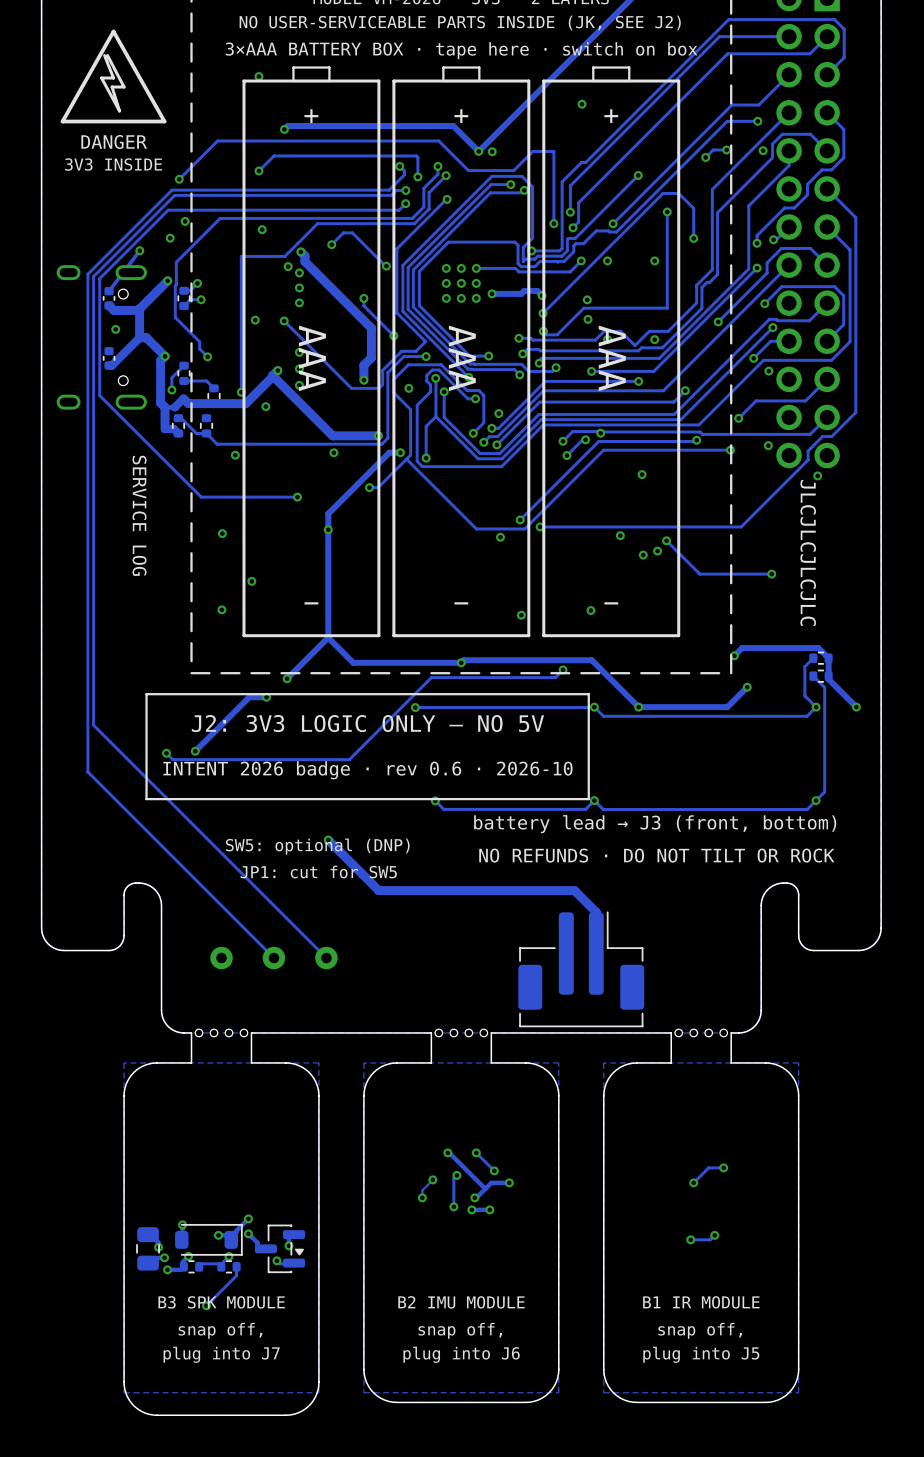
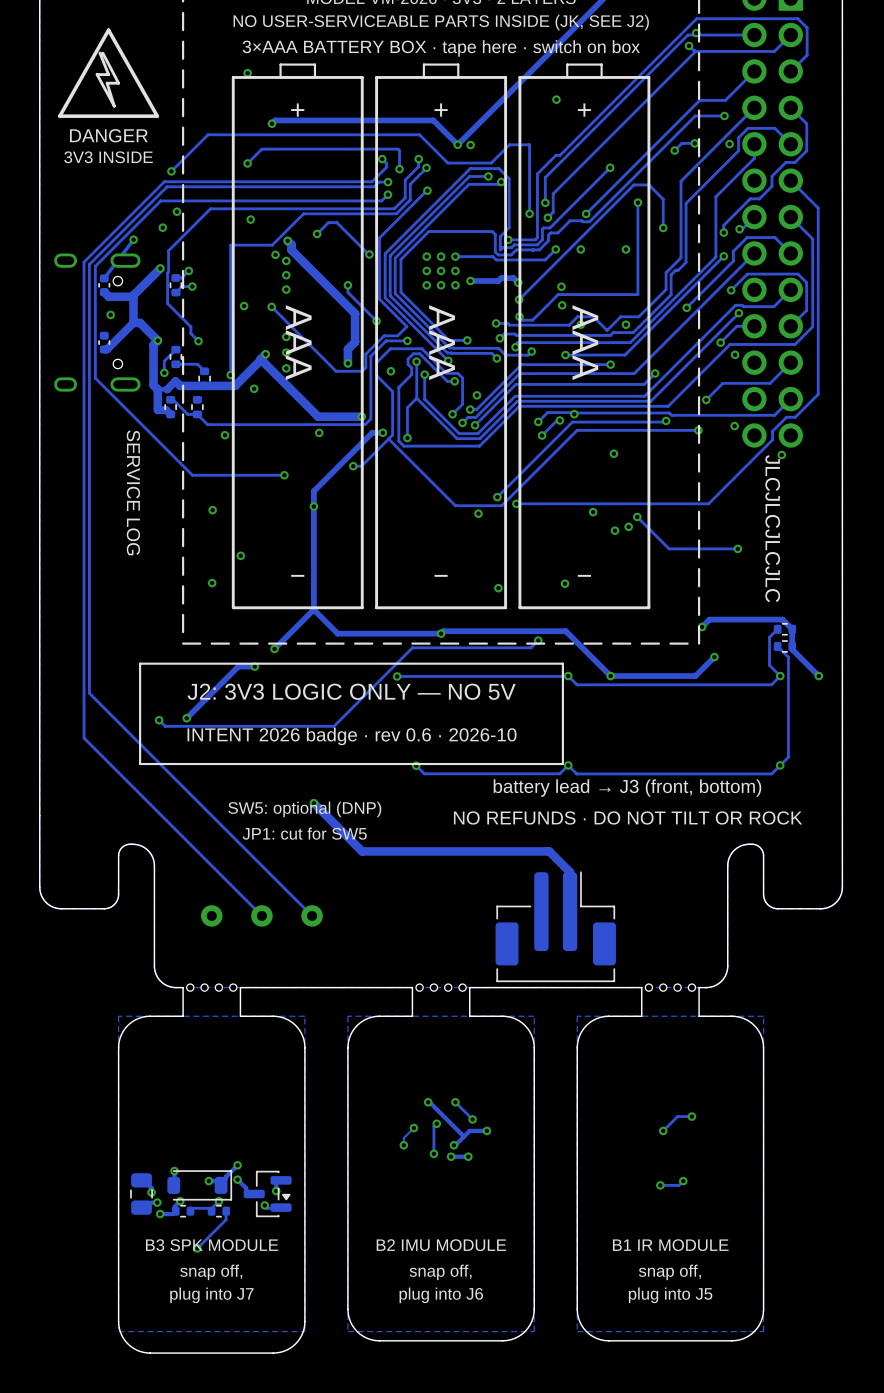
via: none -> (696, 33)
track: none -> (689, 45) (694, 50)
via: none -> (689, 45)

